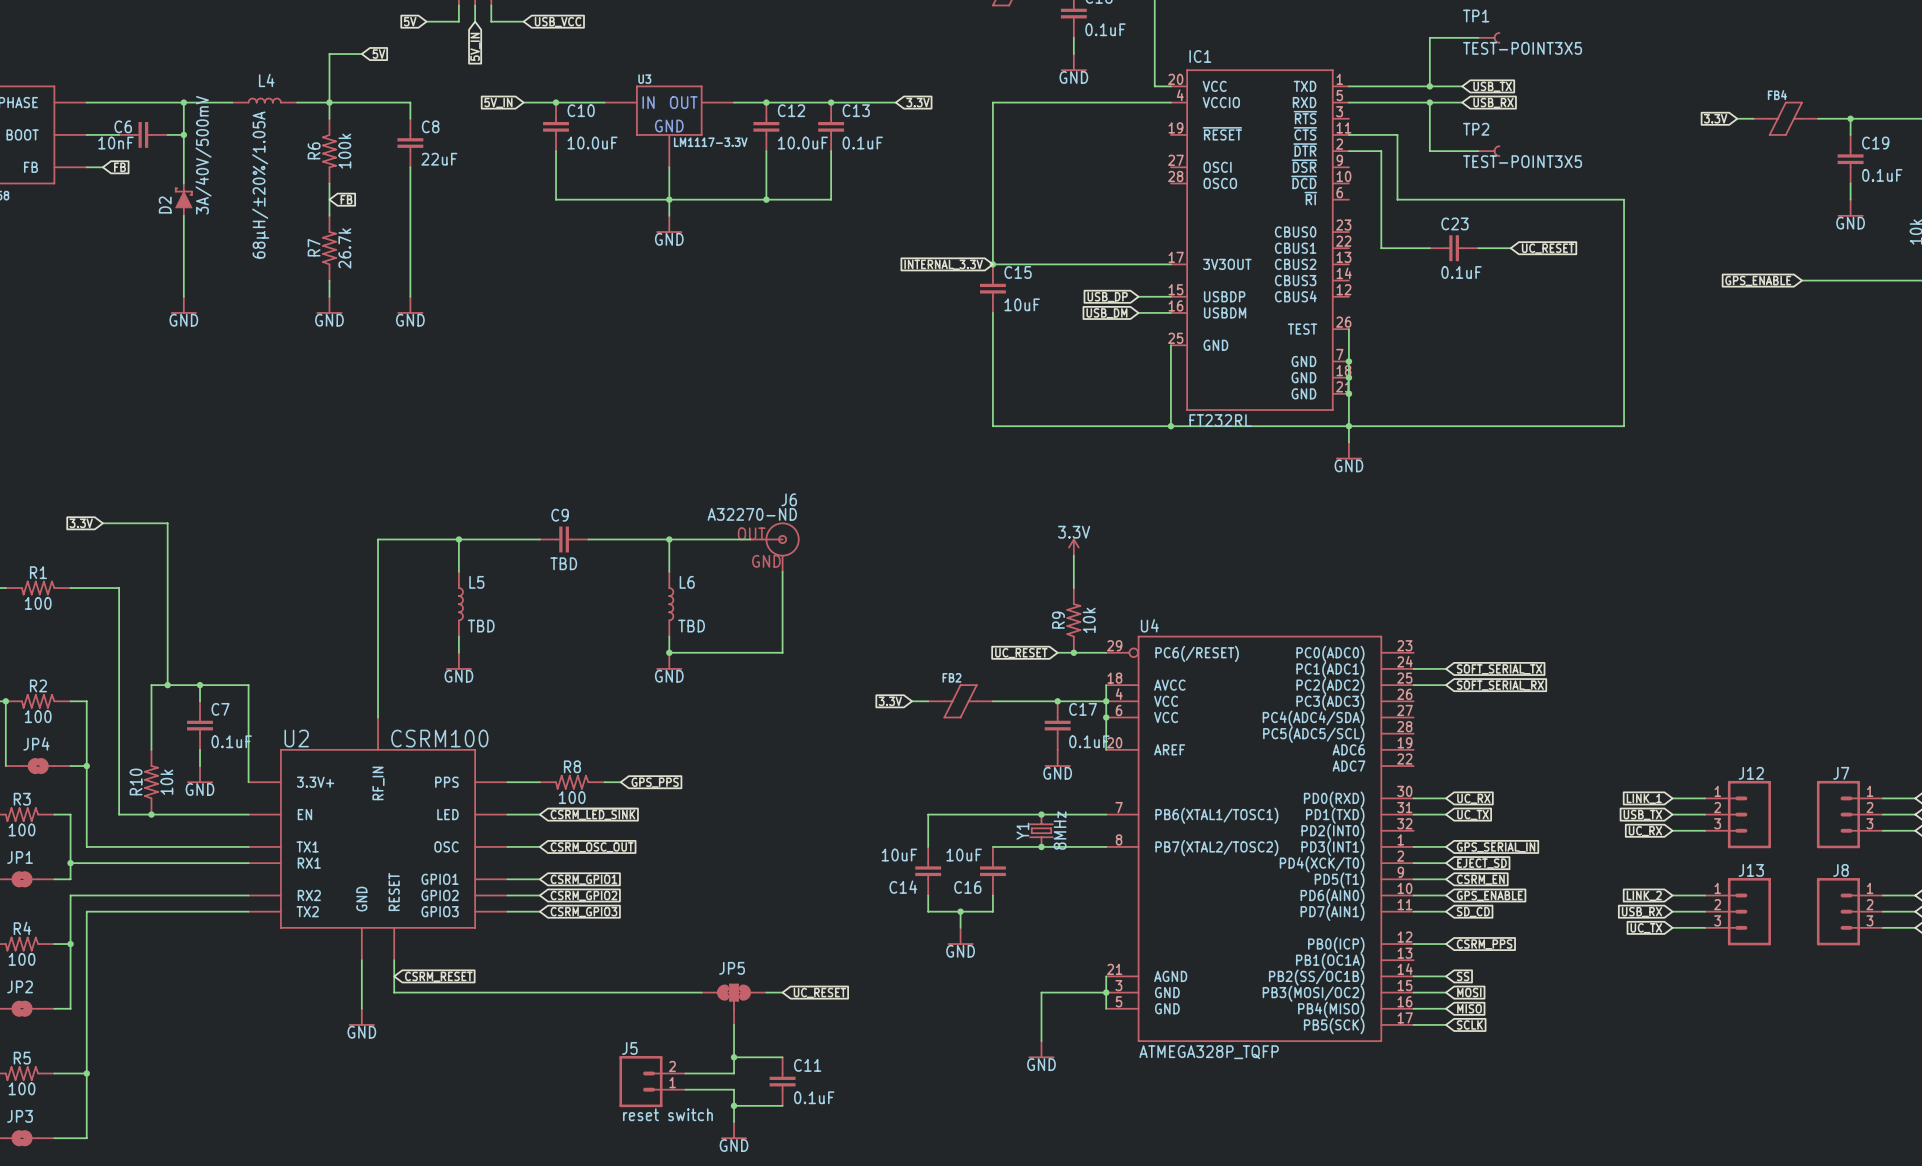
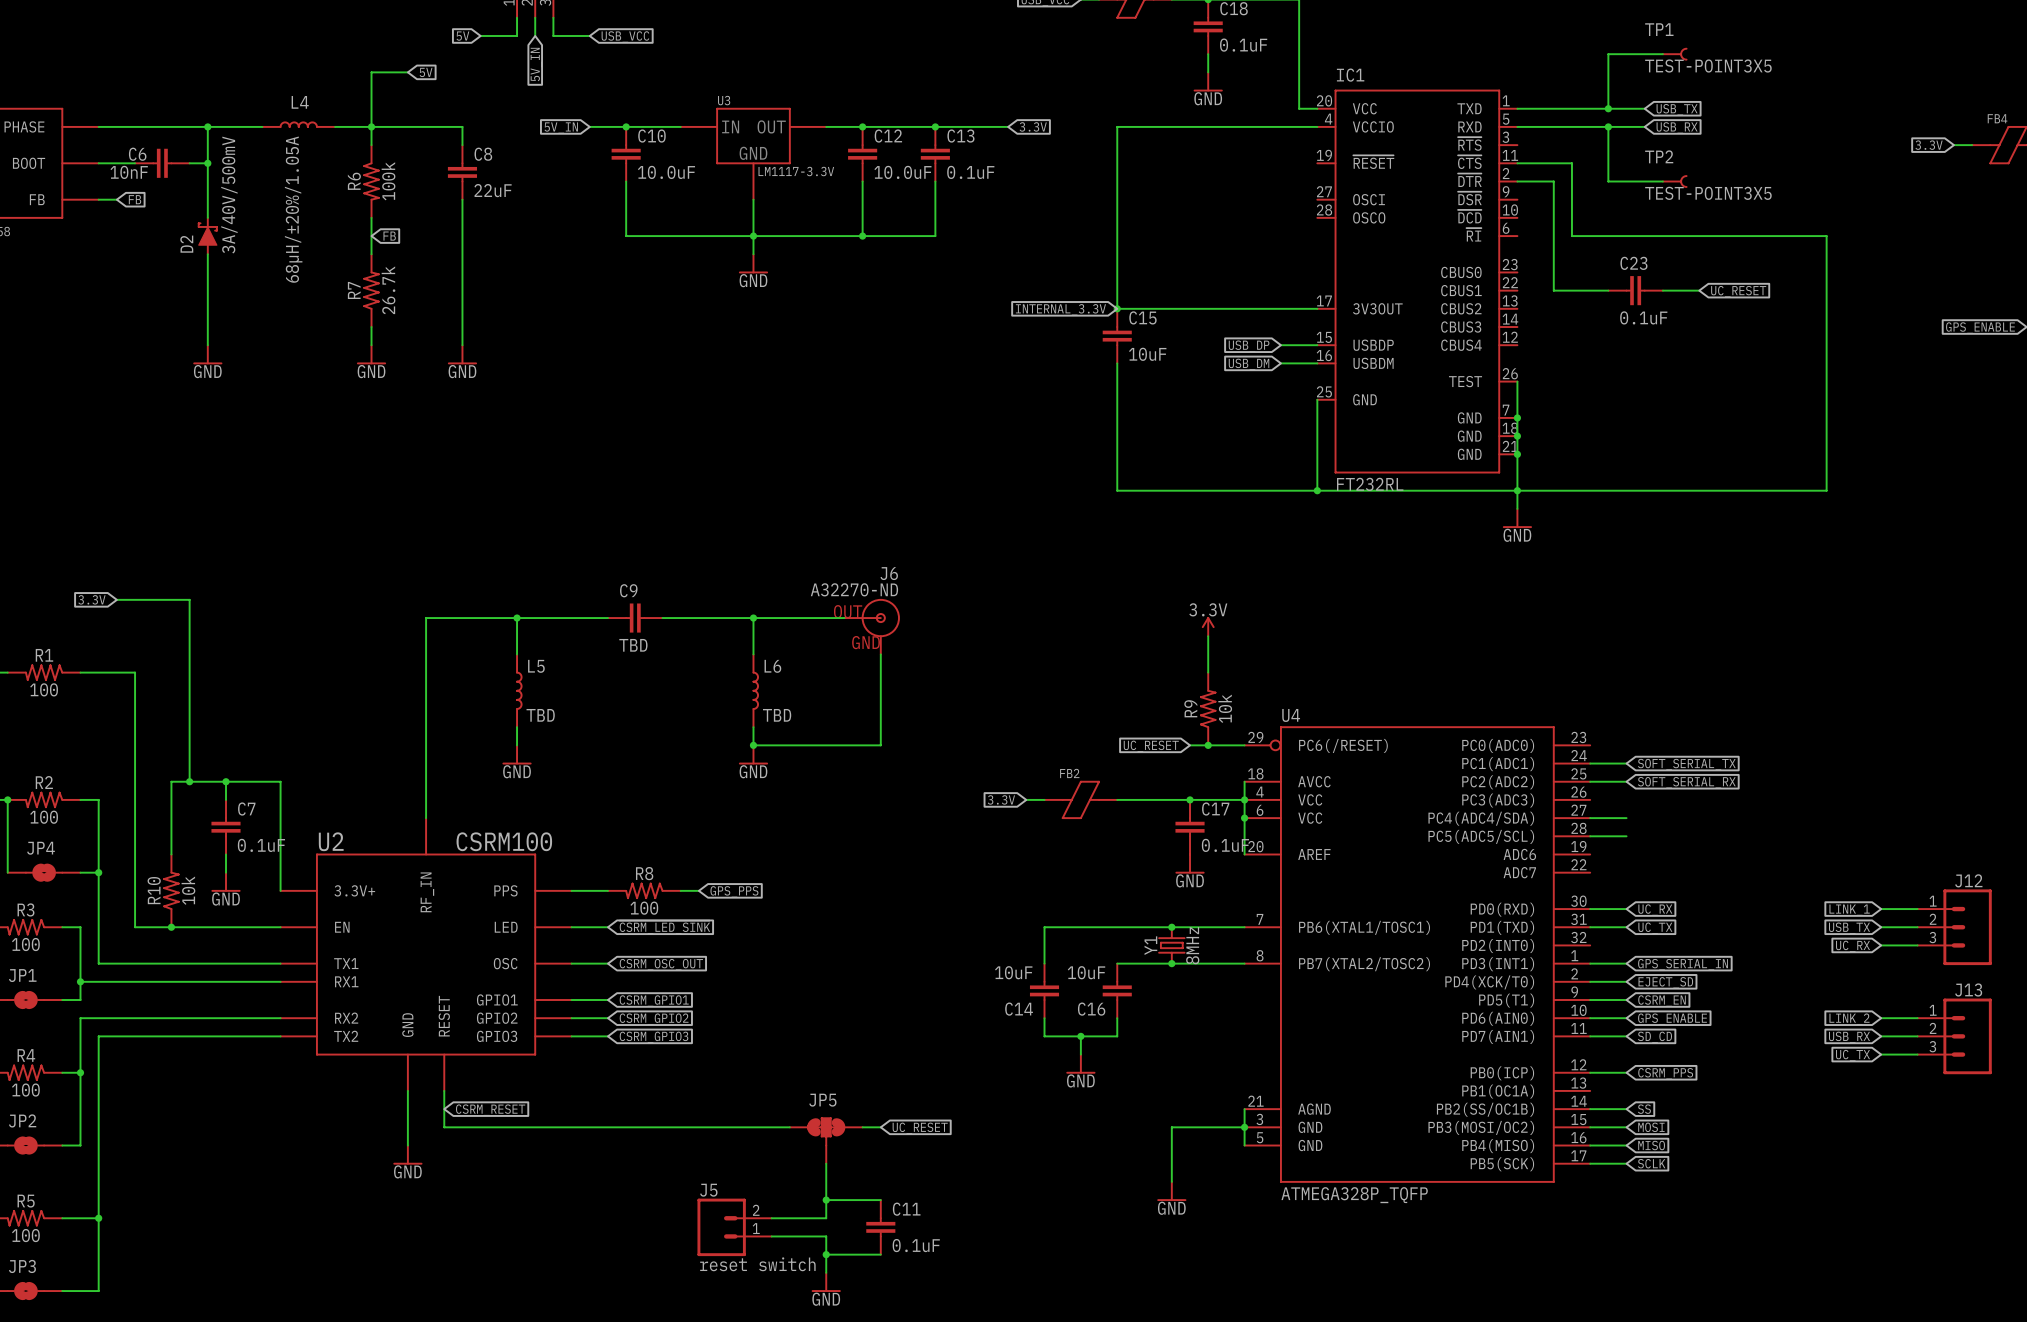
wire: none -> (1590, 818) (1626, 818)
wire: none -> (1590, 836) (1626, 836)

